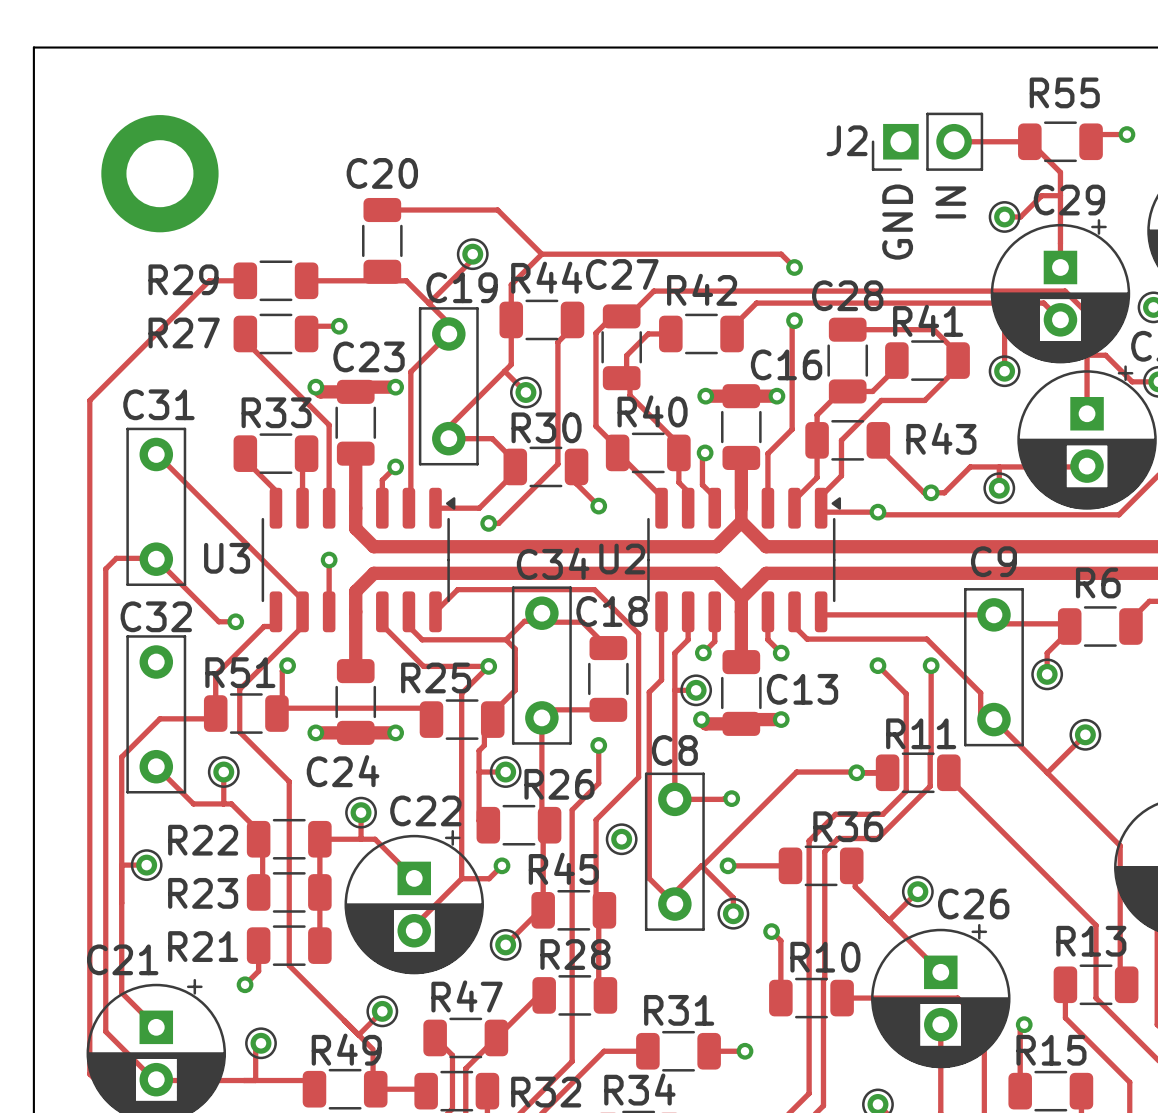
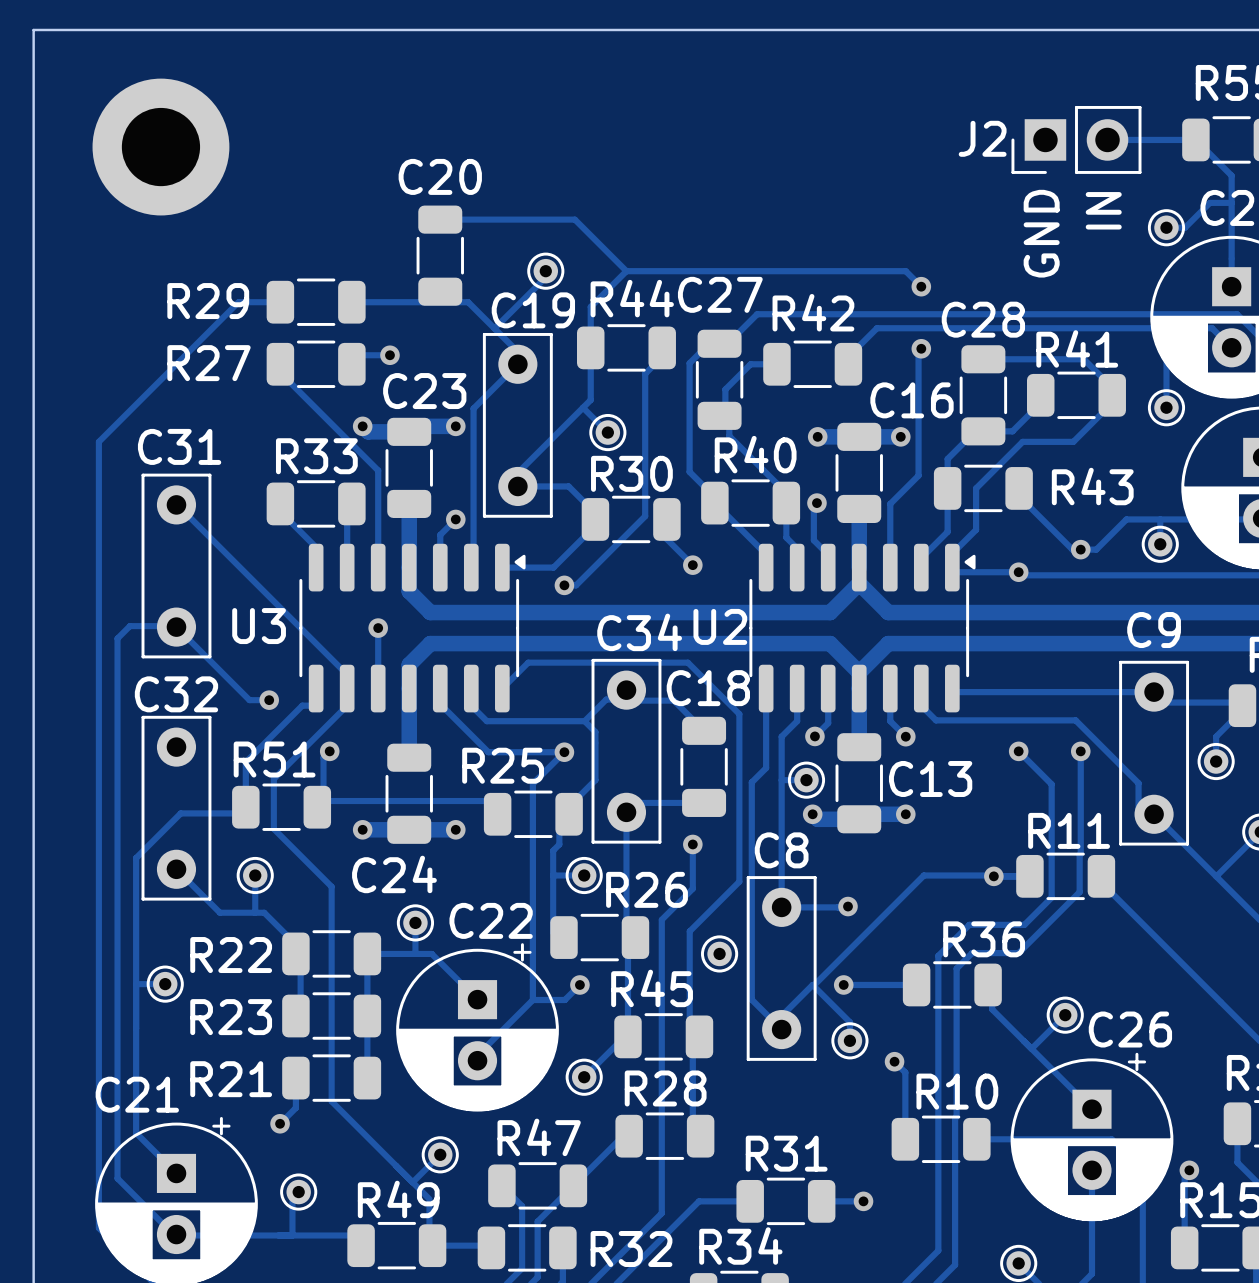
part position: (159, 173) -> (160, 147)

